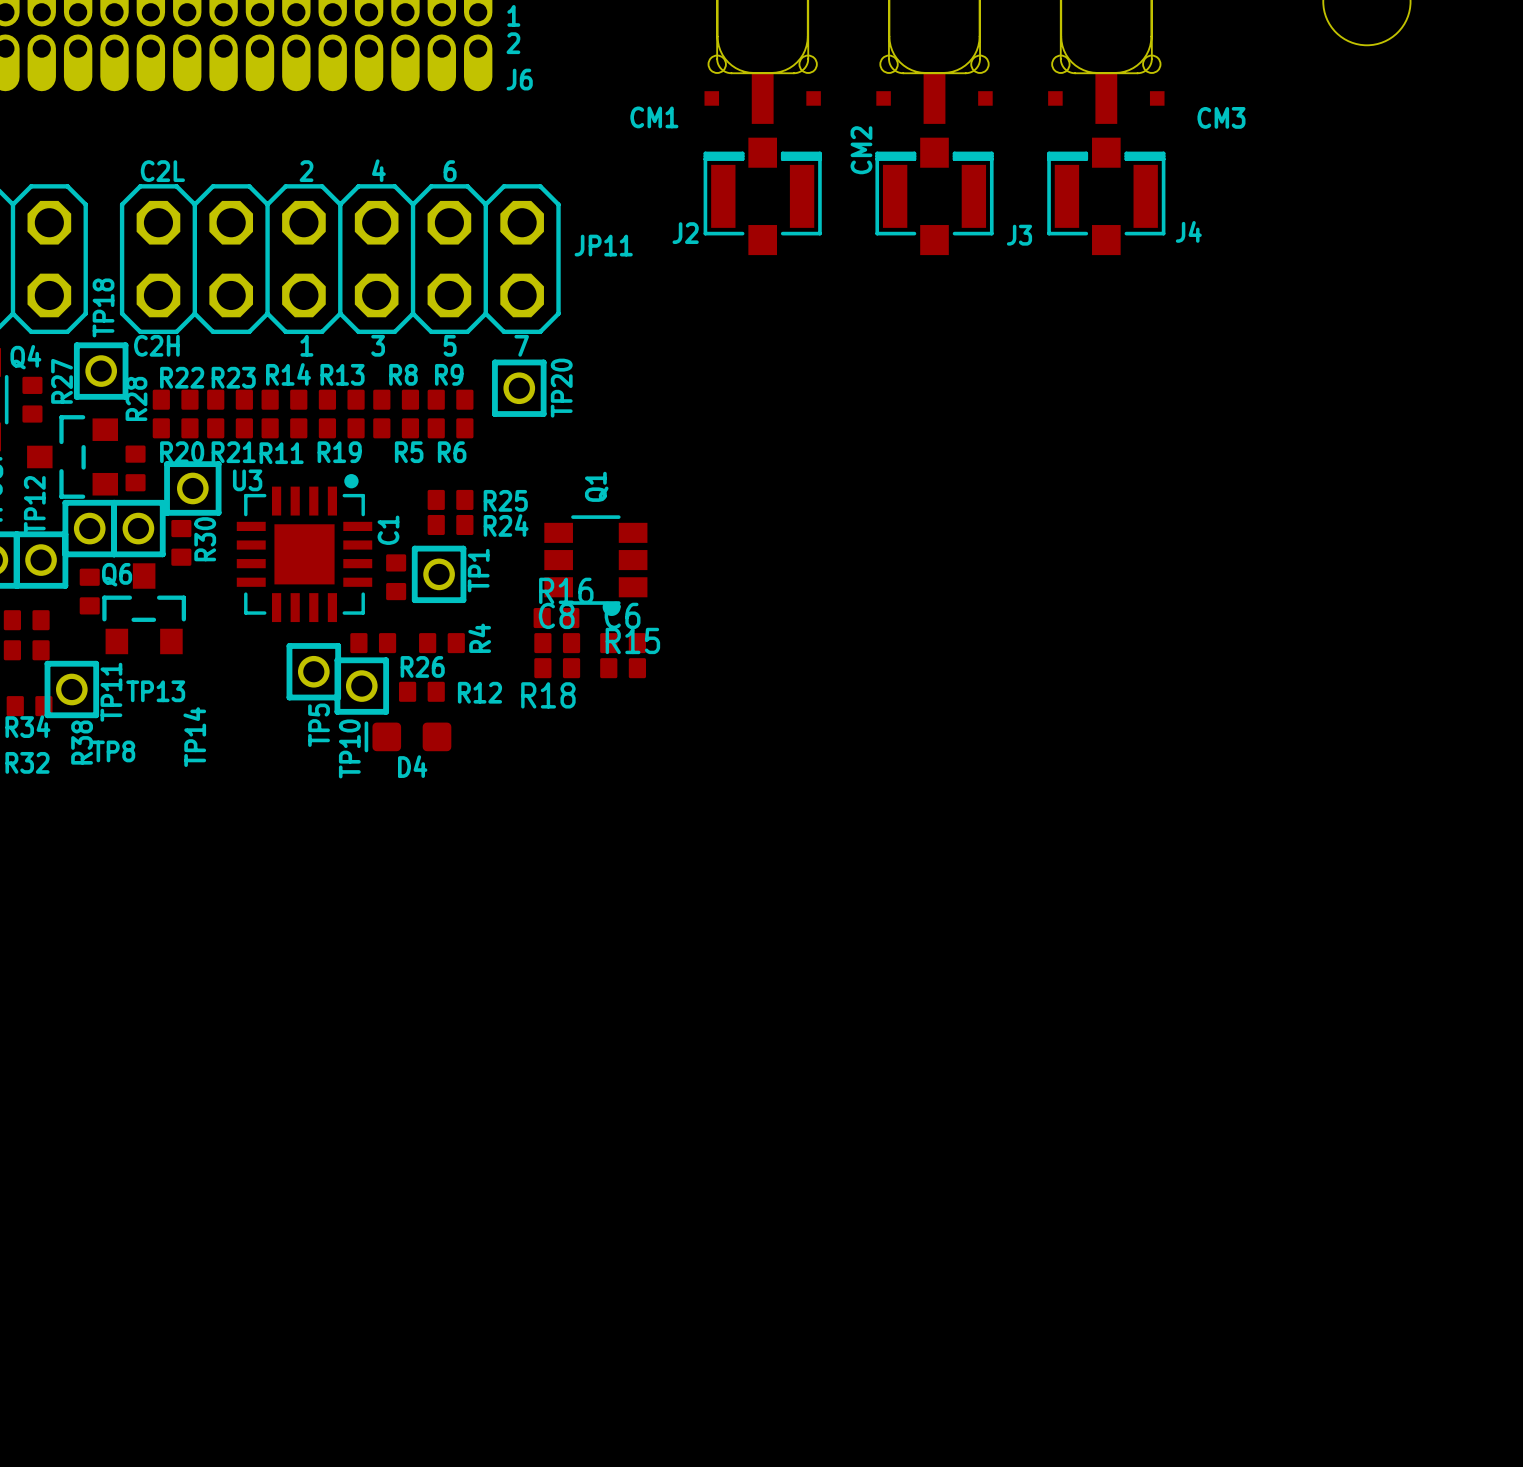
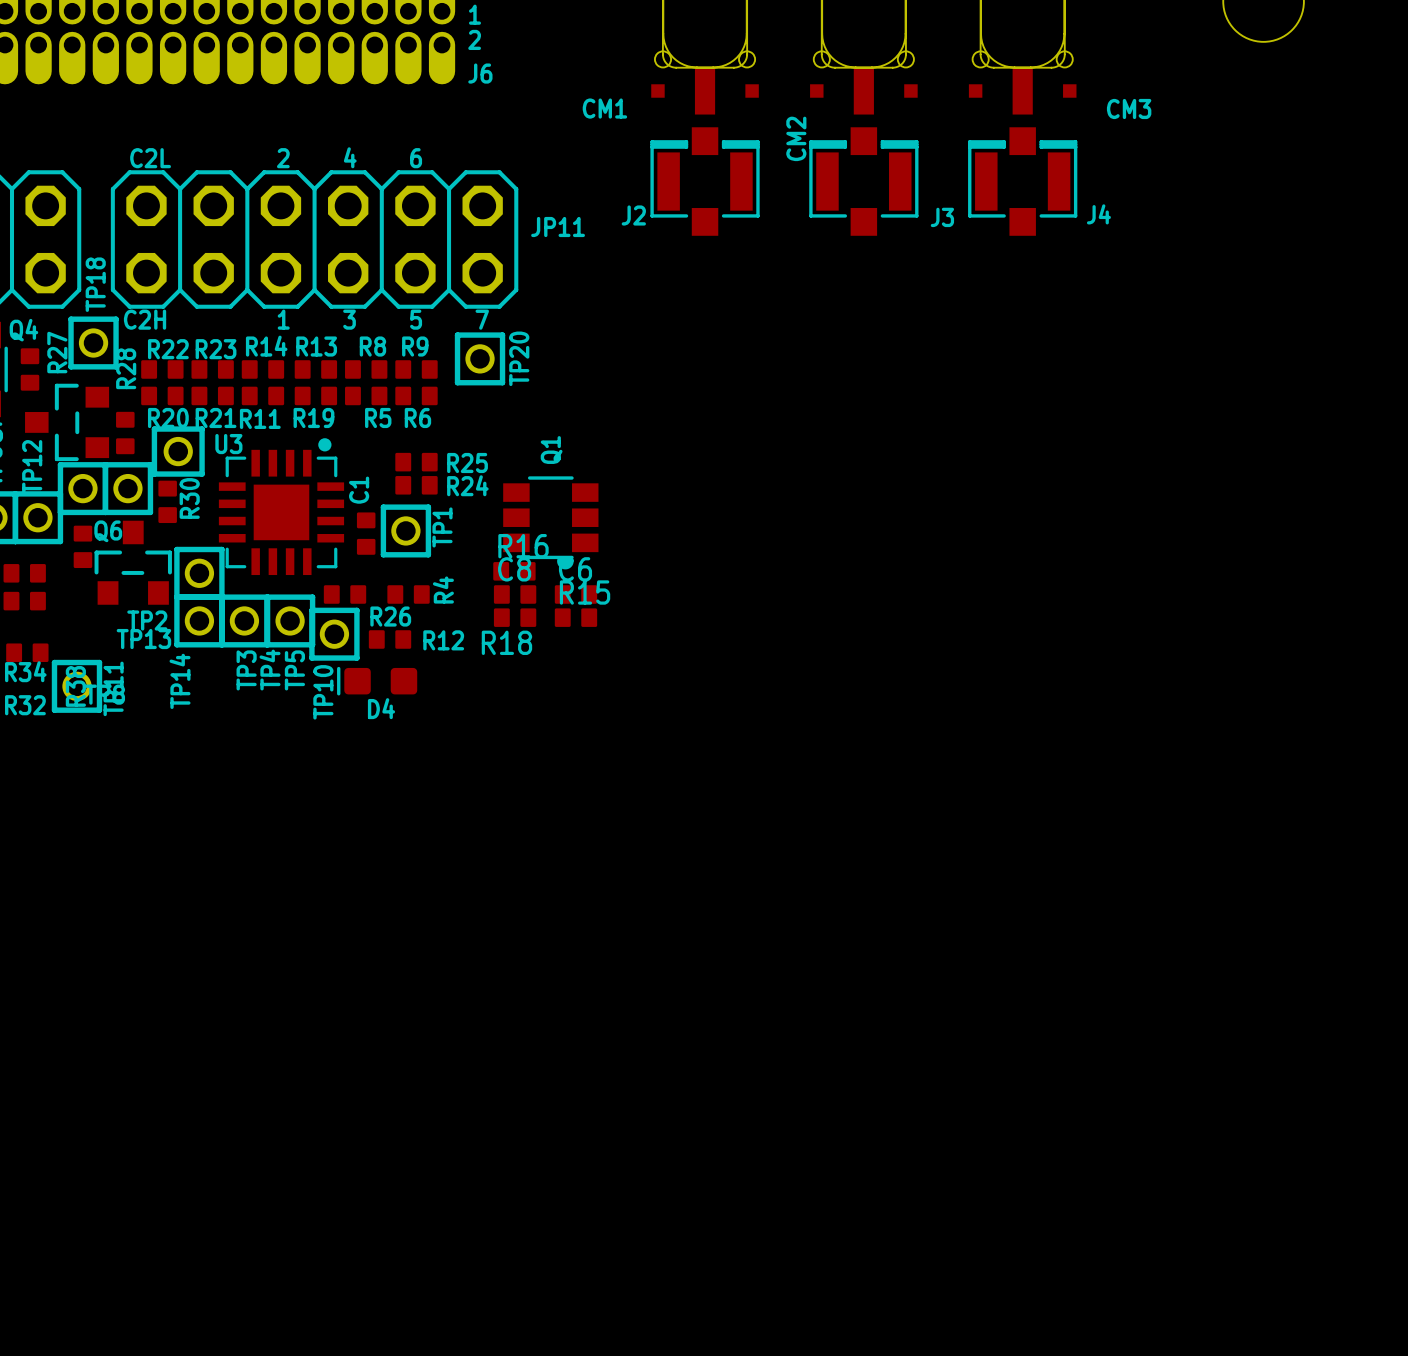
TP2: none -> (199, 573)
TP3: none -> (199, 620)
TP4: none -> (244, 620)
TP11 position: (71, 689) -> (76, 686)

